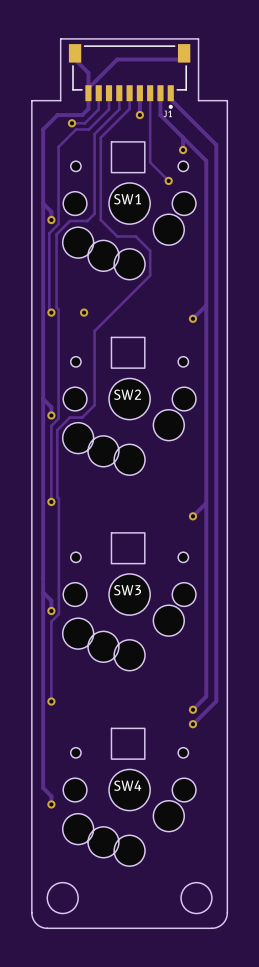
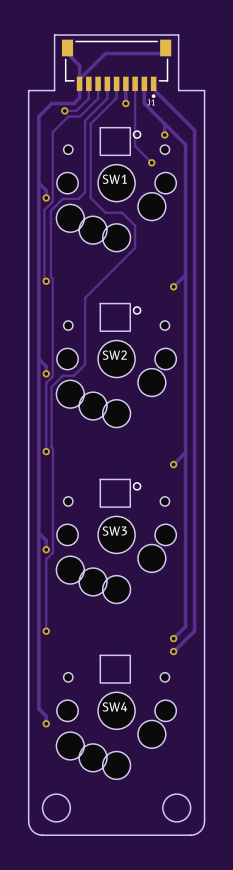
SW1 footprint: [62, 141, 196, 280] -> [56, 127, 177, 252]
via: (84, 312) -> none
SW2 footprint: [62, 336, 196, 476] -> [56, 303, 177, 428]
SW3 footprint: [62, 532, 196, 671] -> [56, 478, 177, 604]

